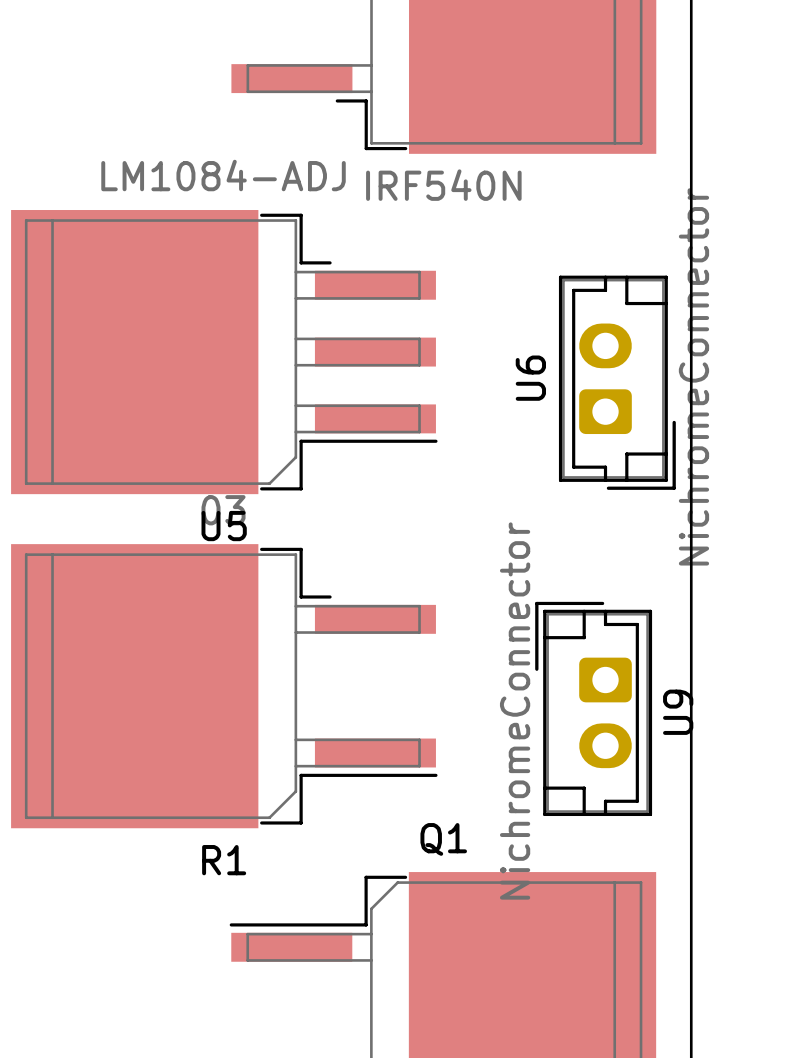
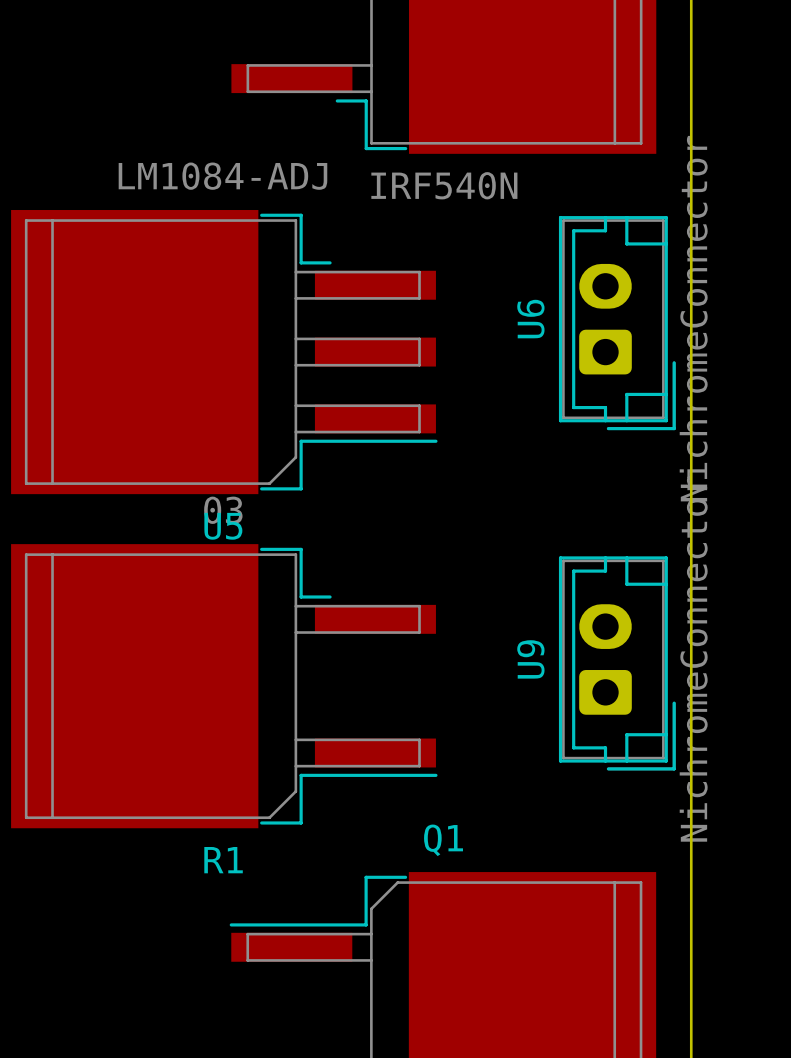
U6 position: (617, 382) -> (617, 323)
U9 rotation: 0° (593, 708) -> 180° (617, 663)

